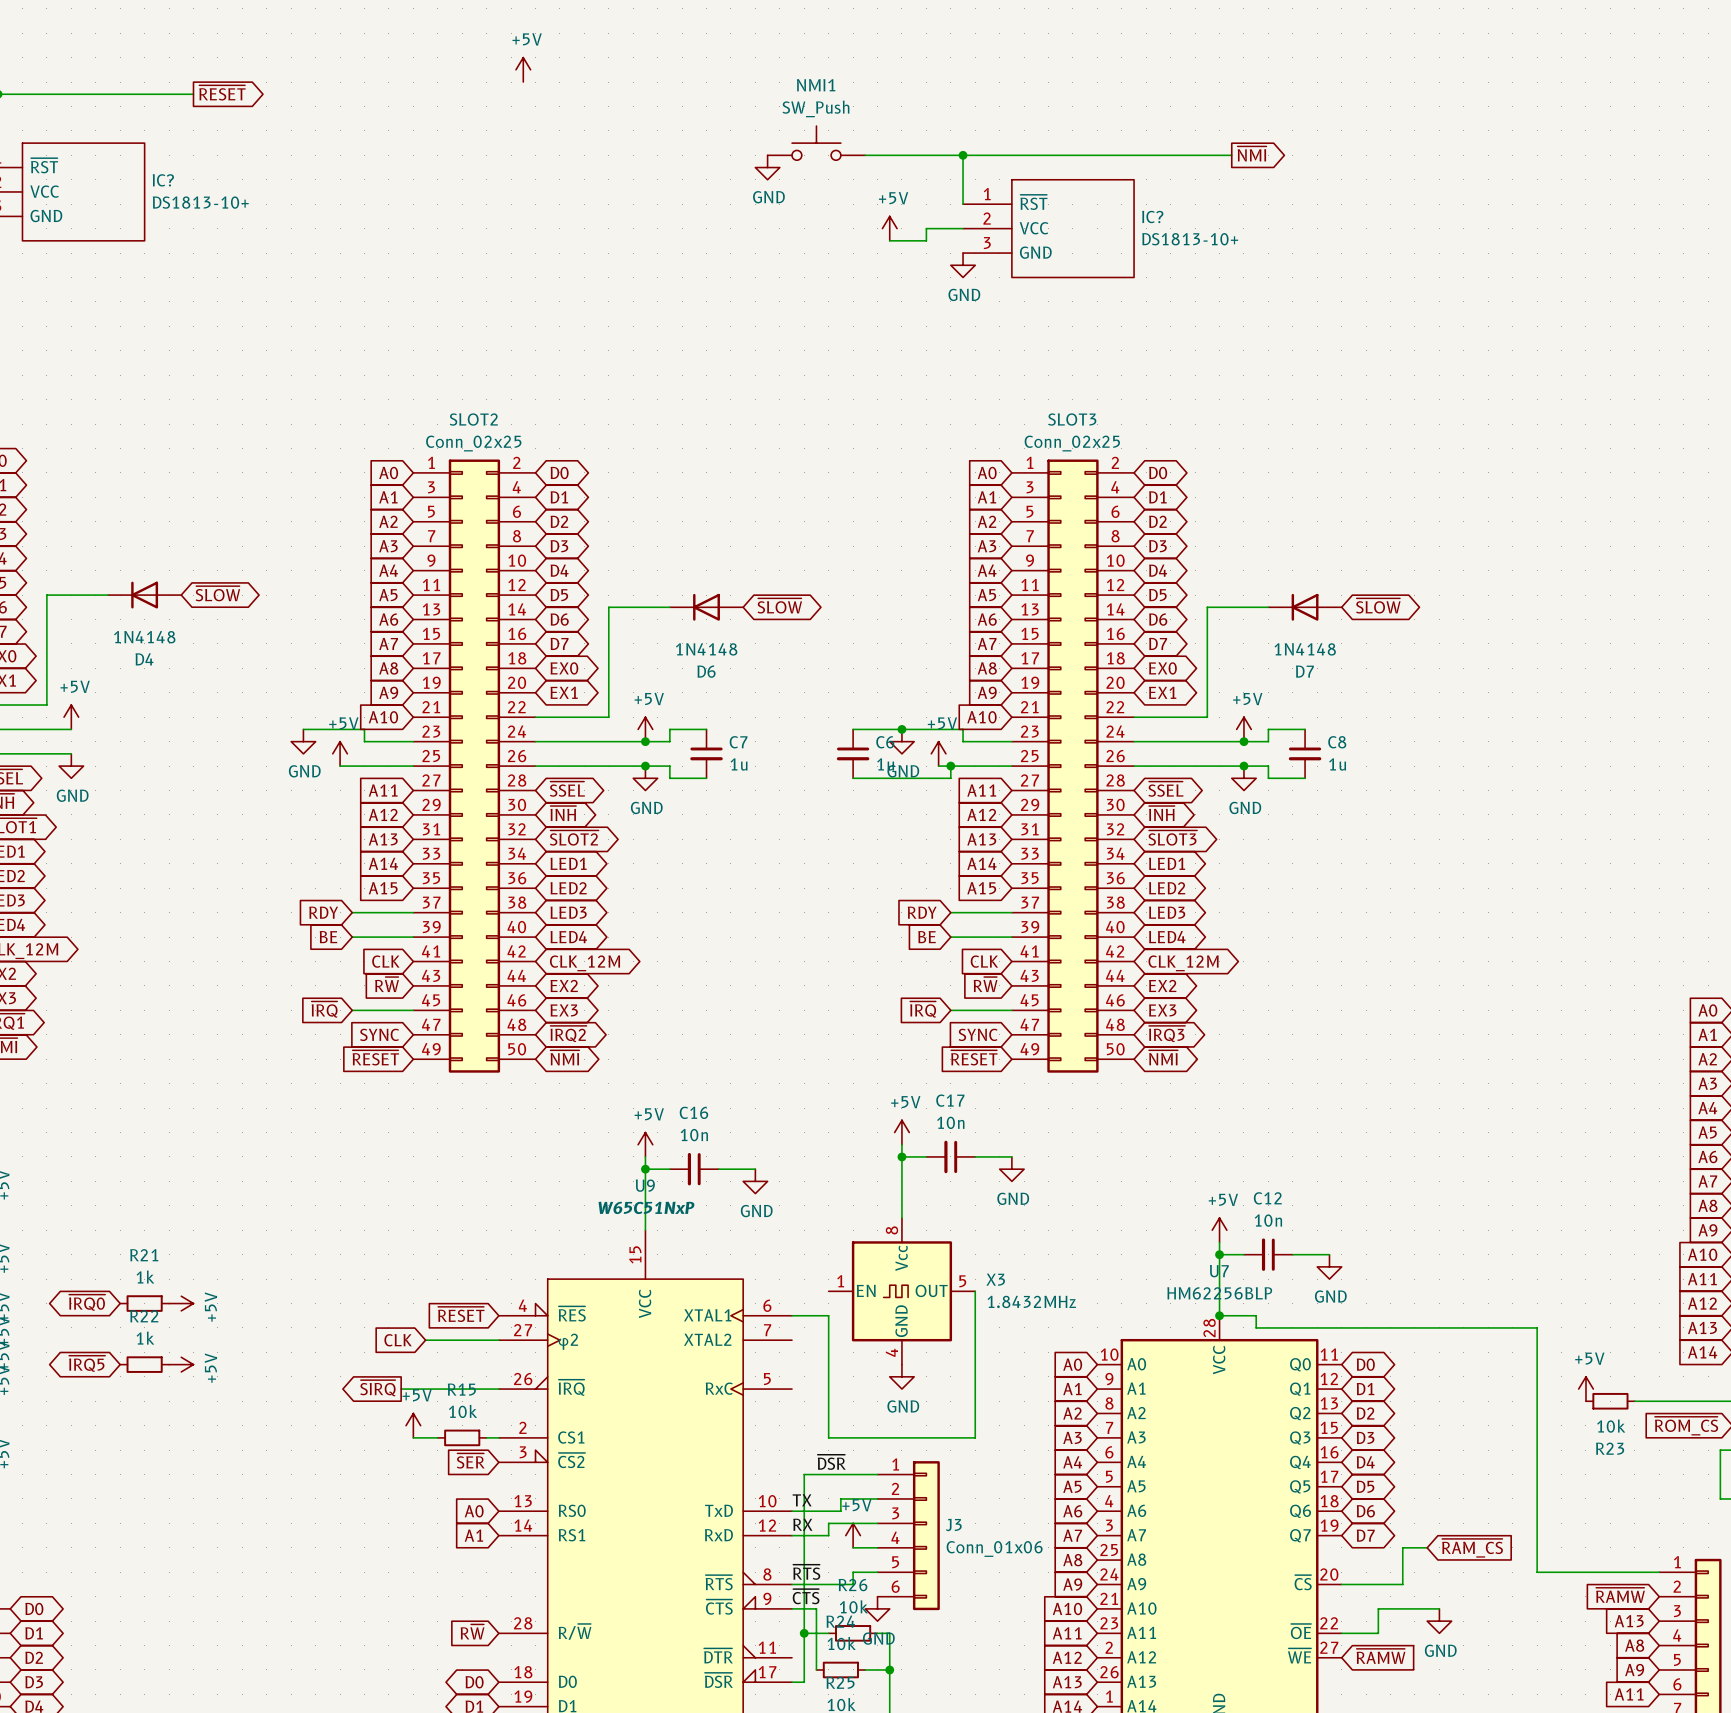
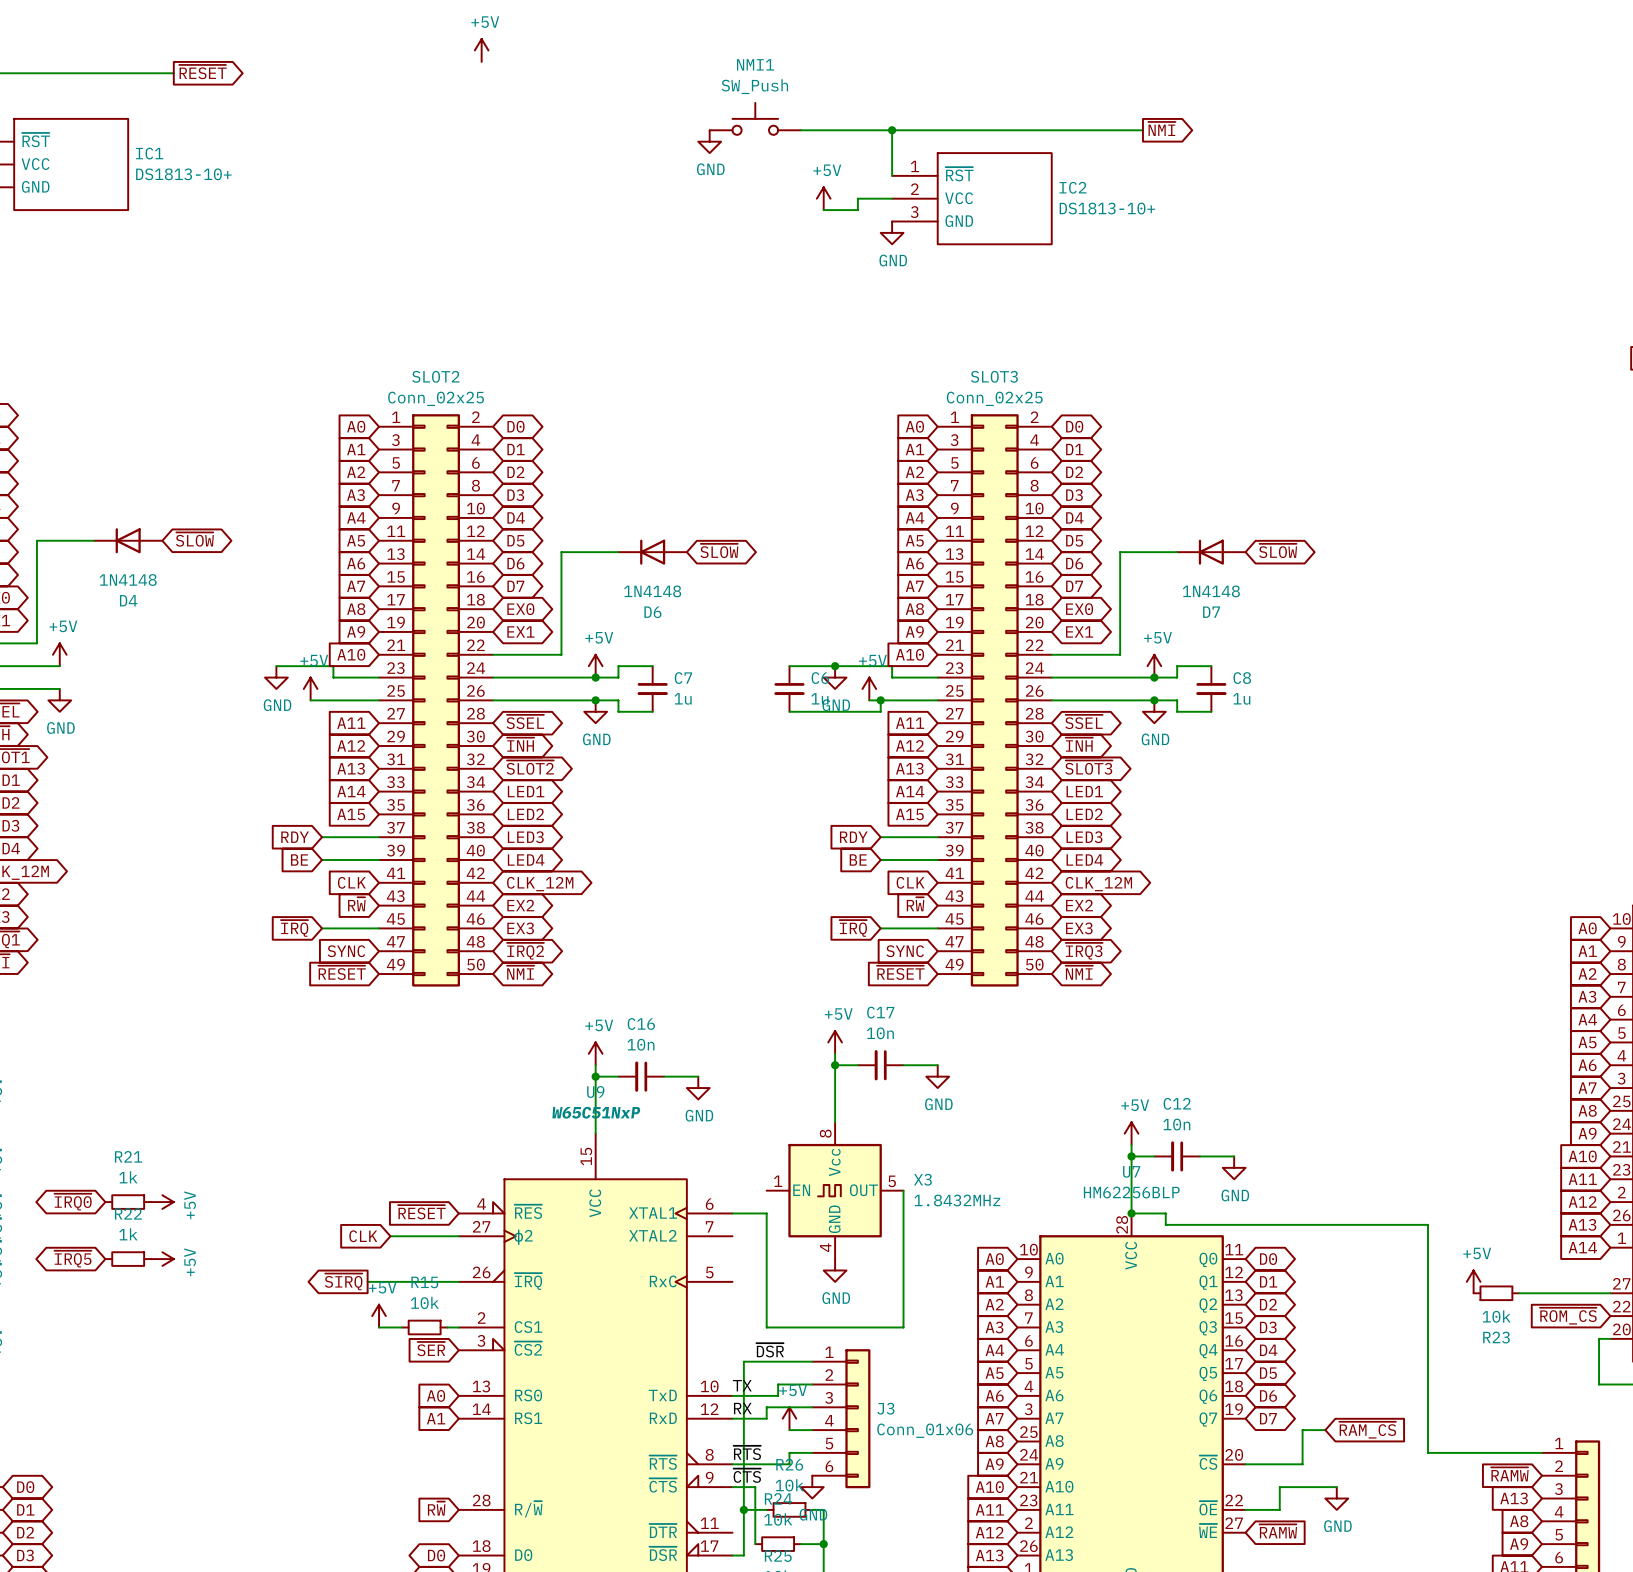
IC? name: IC? (163, 180) -> IC1 (149, 153)
IC? name: IC? (1152, 216) -> IC2 (1073, 187)

